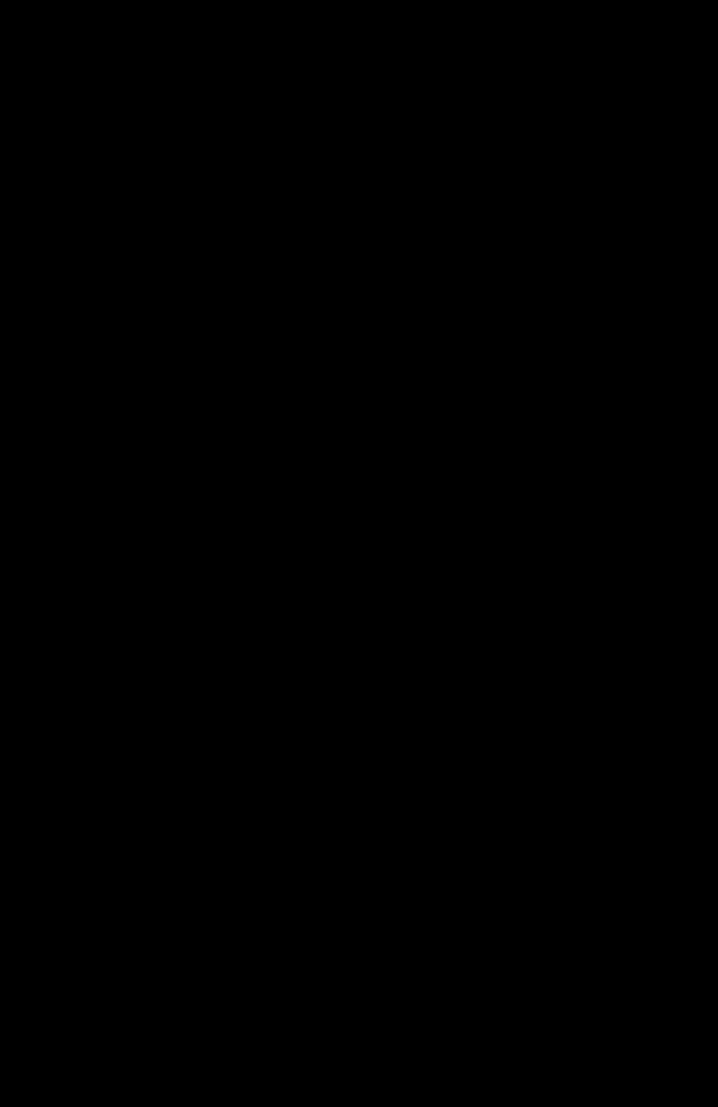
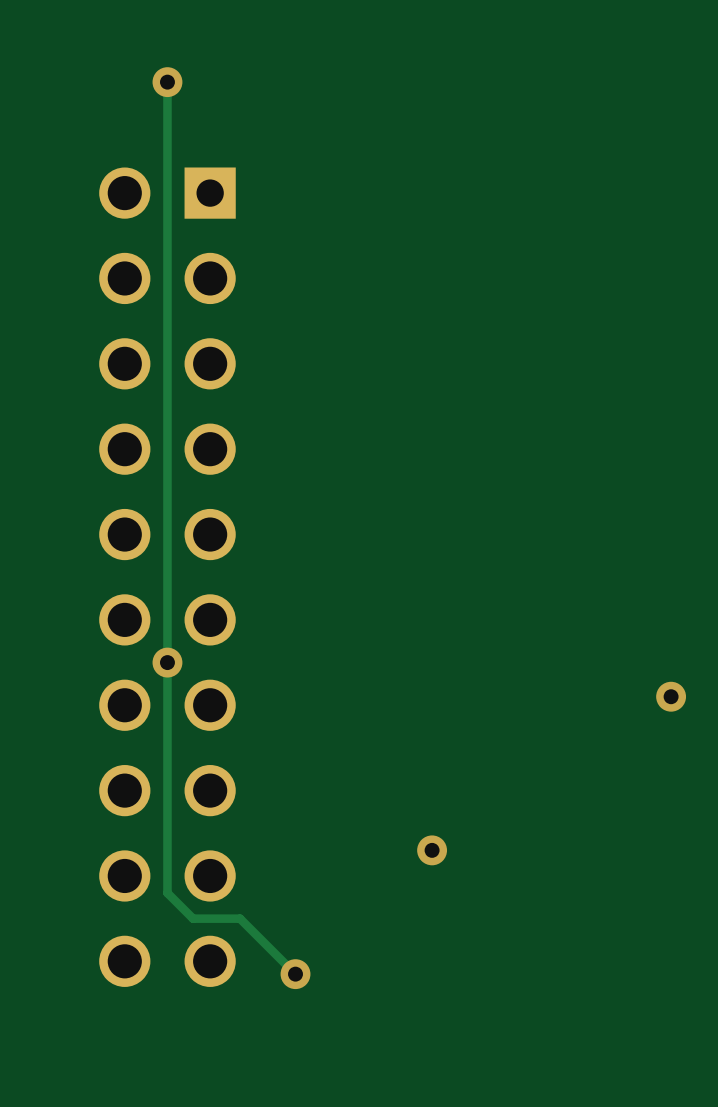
track: none -> (167, 82) (167, 893) (193, 918) (240, 918) (295, 974)
via: none -> (167, 82)
part: none -> (167, 577)
via: none -> (167, 662)
via: none -> (671, 696)
via: none -> (432, 850)
via: none -> (295, 974)

